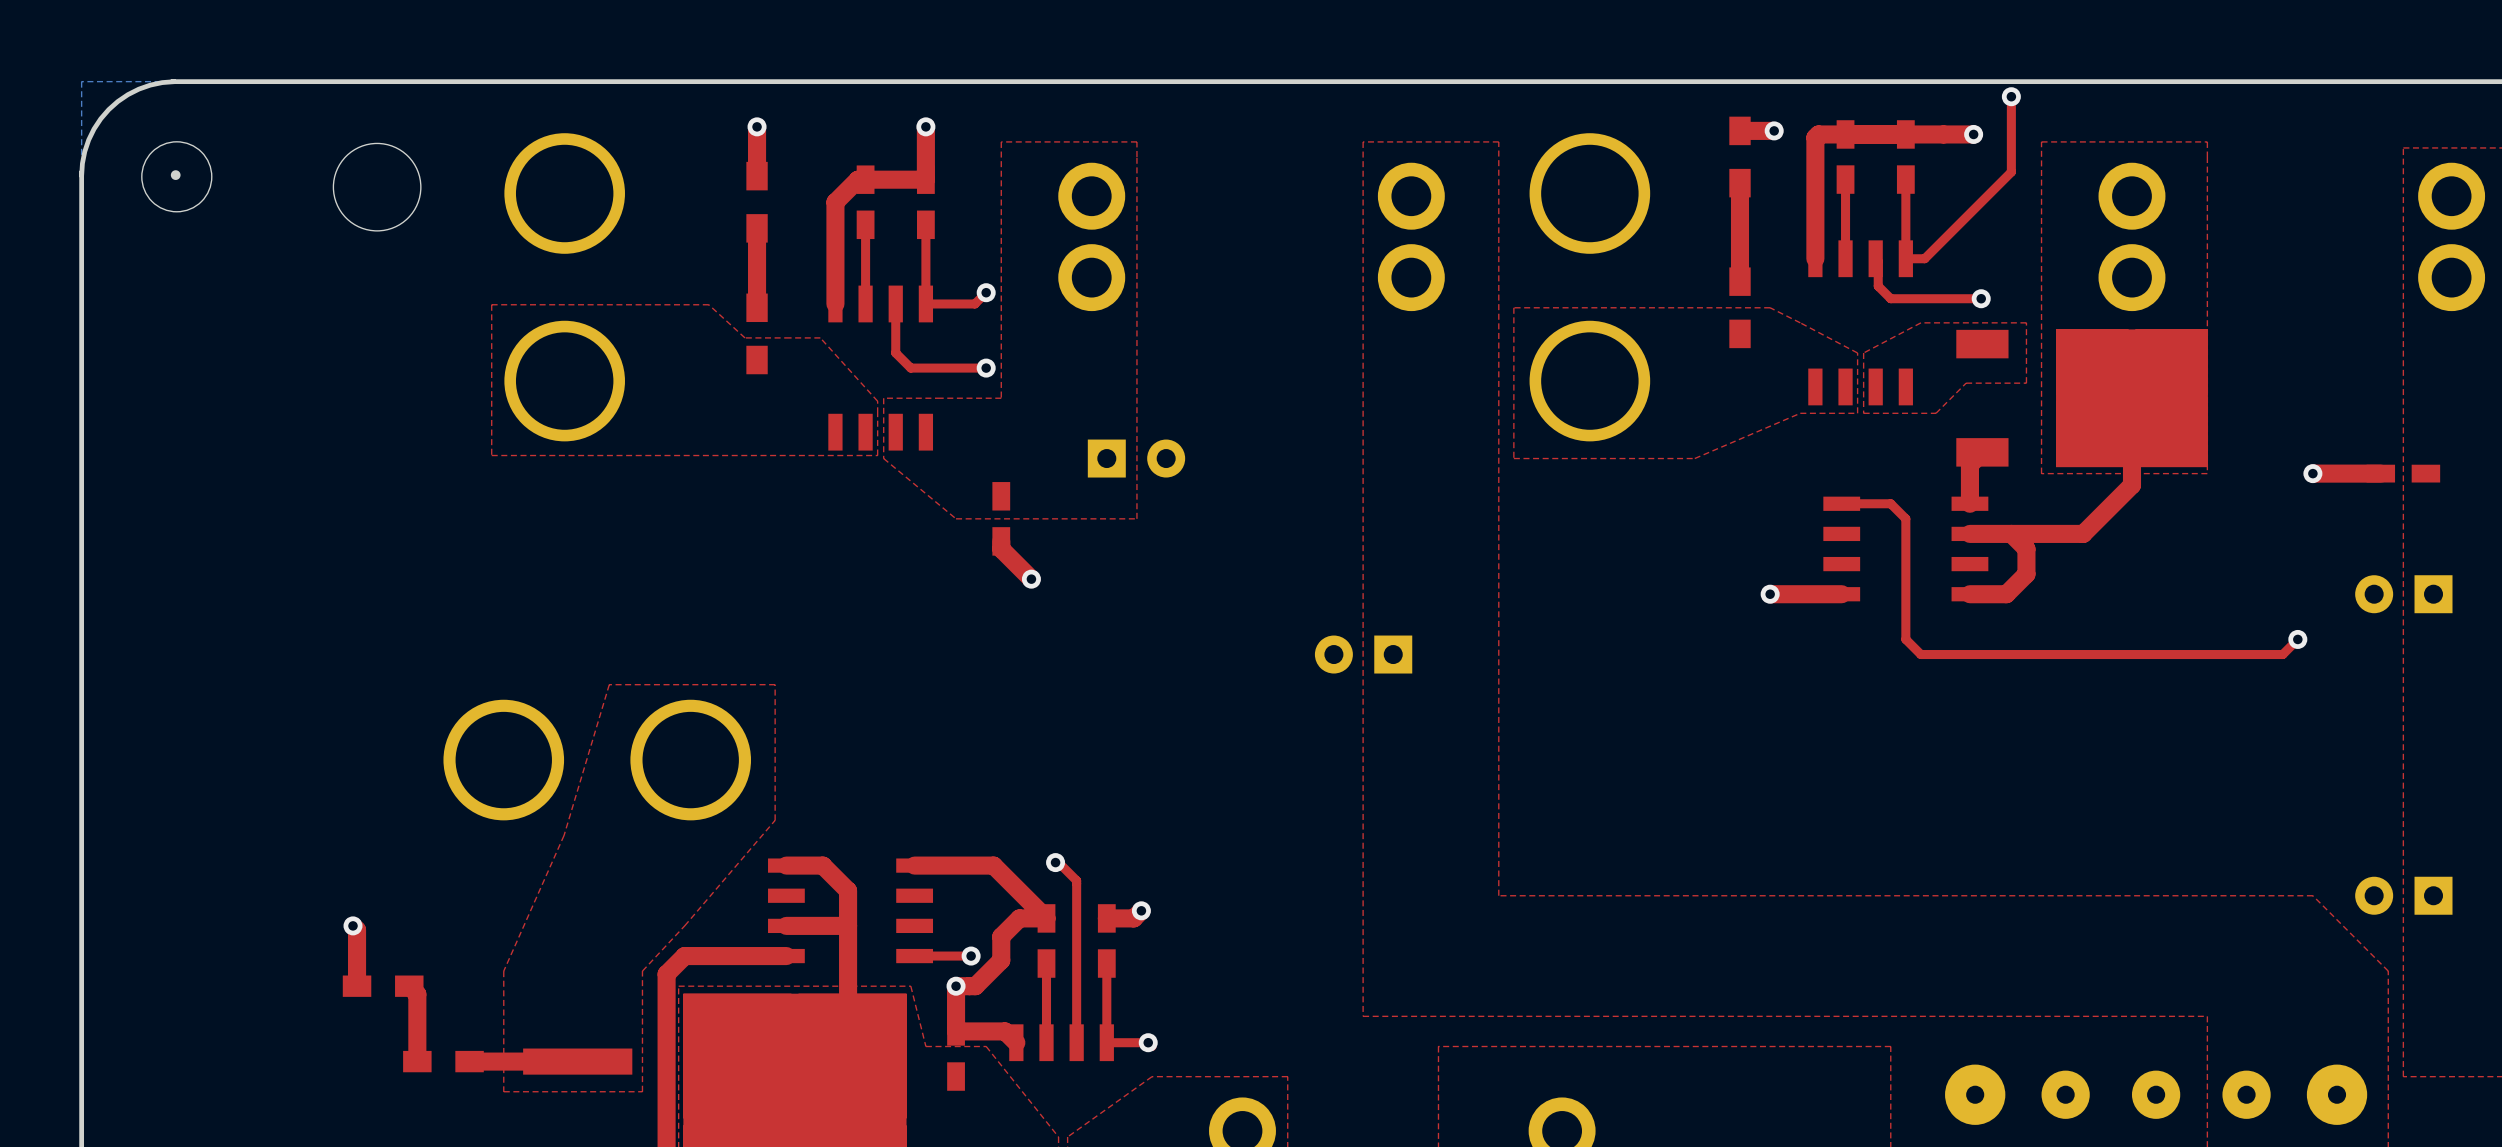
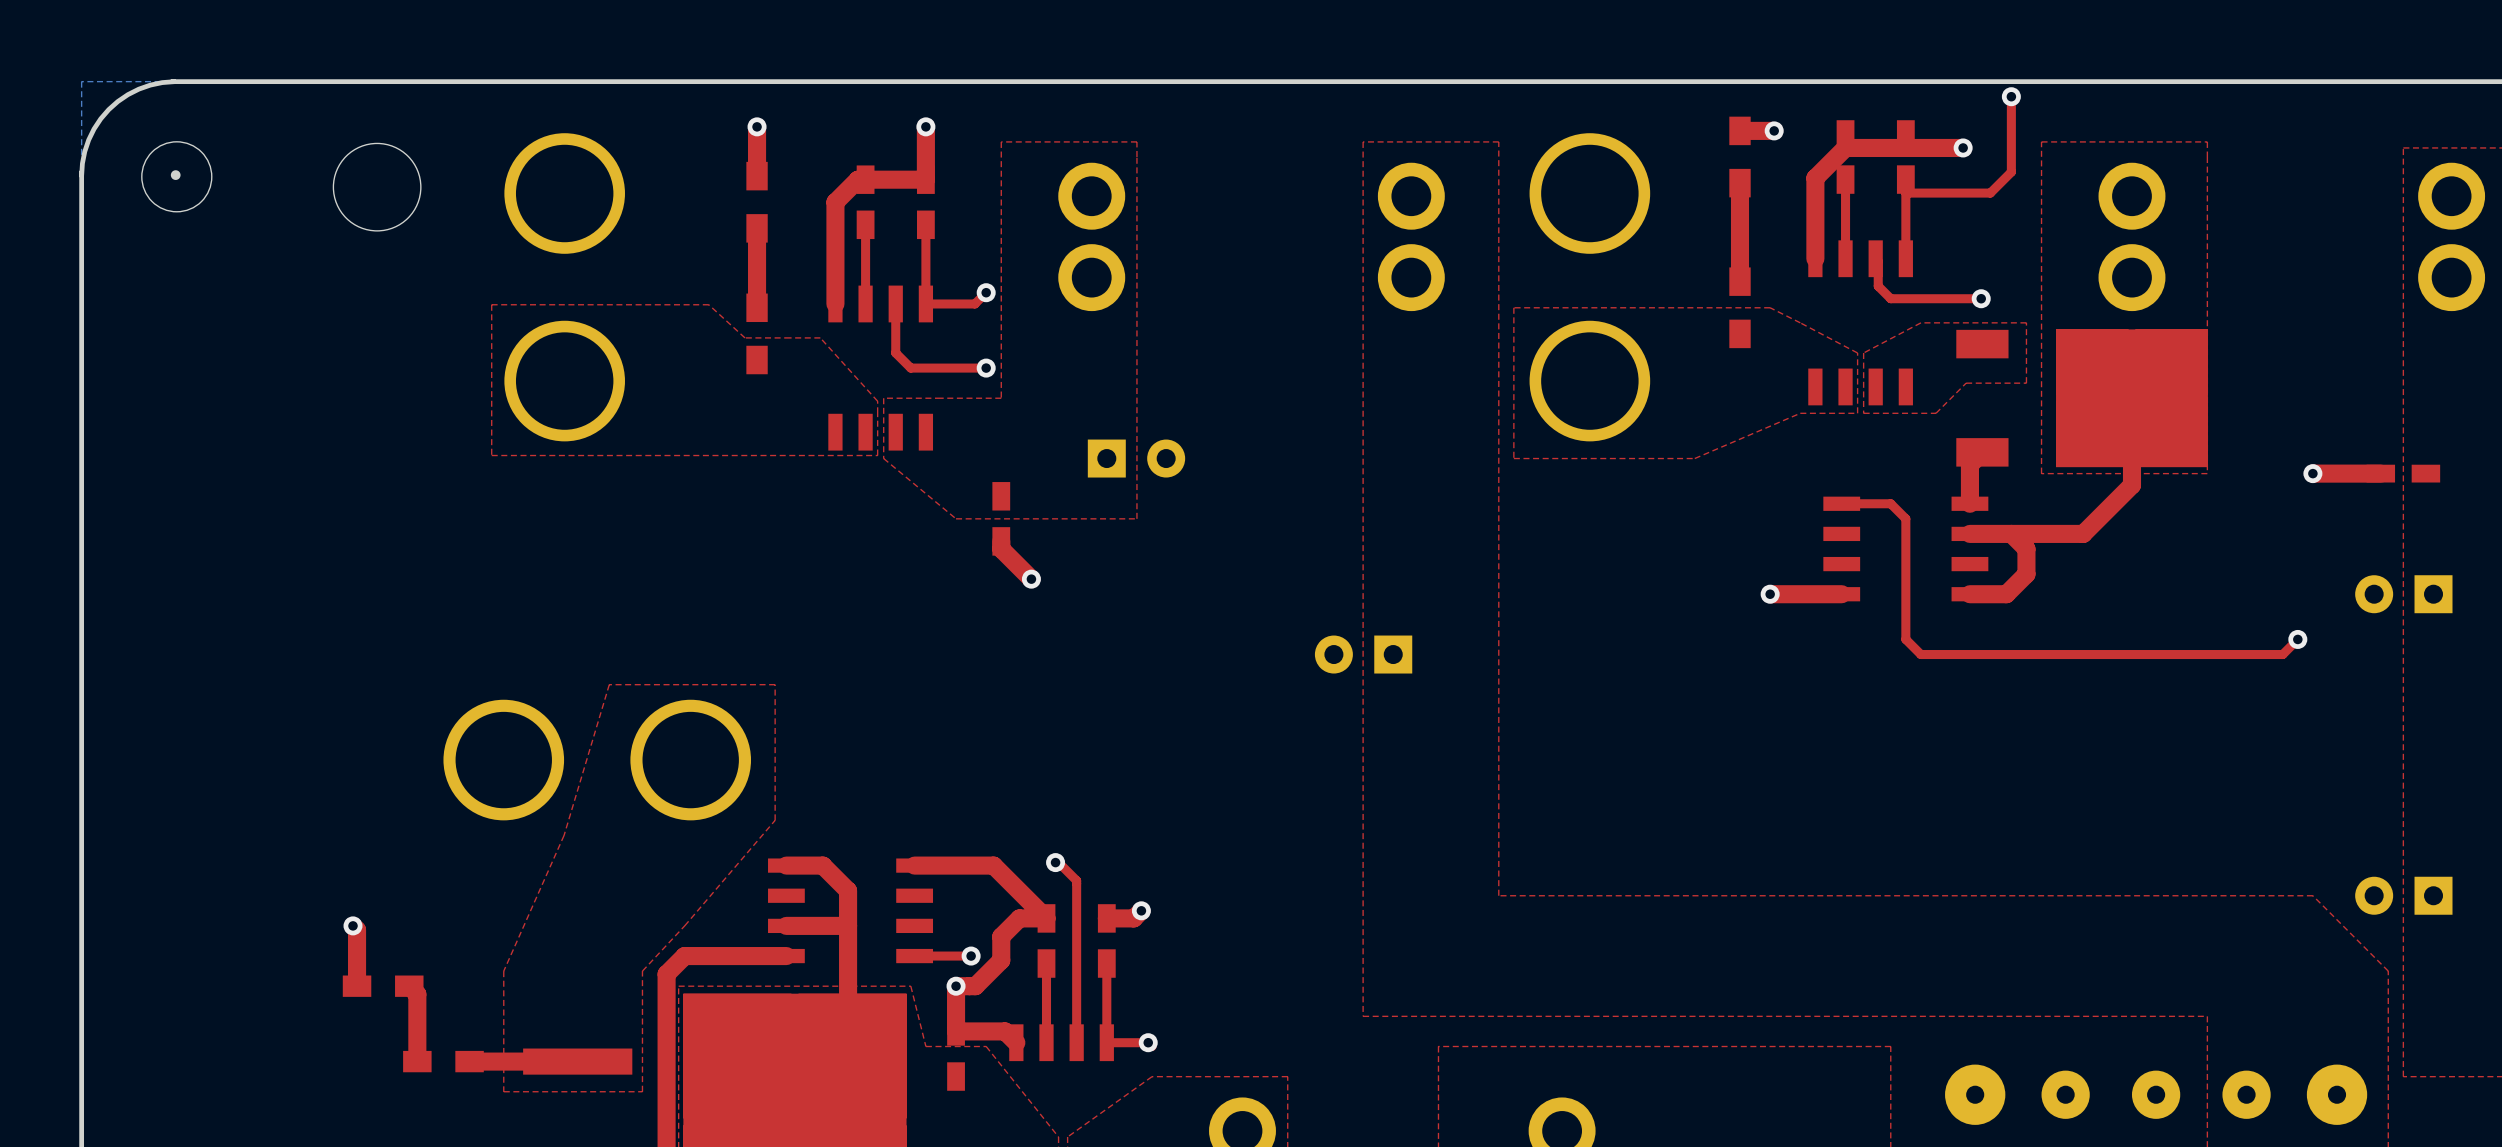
top track: (1973, 134) (1818, 134) (1815, 137) (1815, 178) -> (1963, 147) (1845, 147) (1815, 178)
via position: (1973, 134) -> (1963, 147)
top track: (1990, 193) (1924, 258) (1905, 258) -> (1990, 193) (1905, 193)

